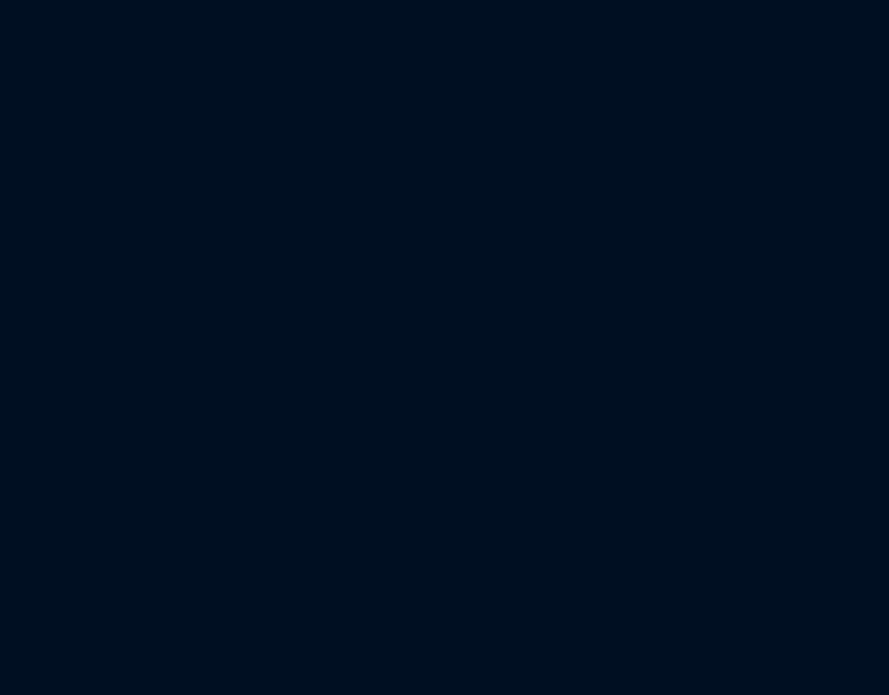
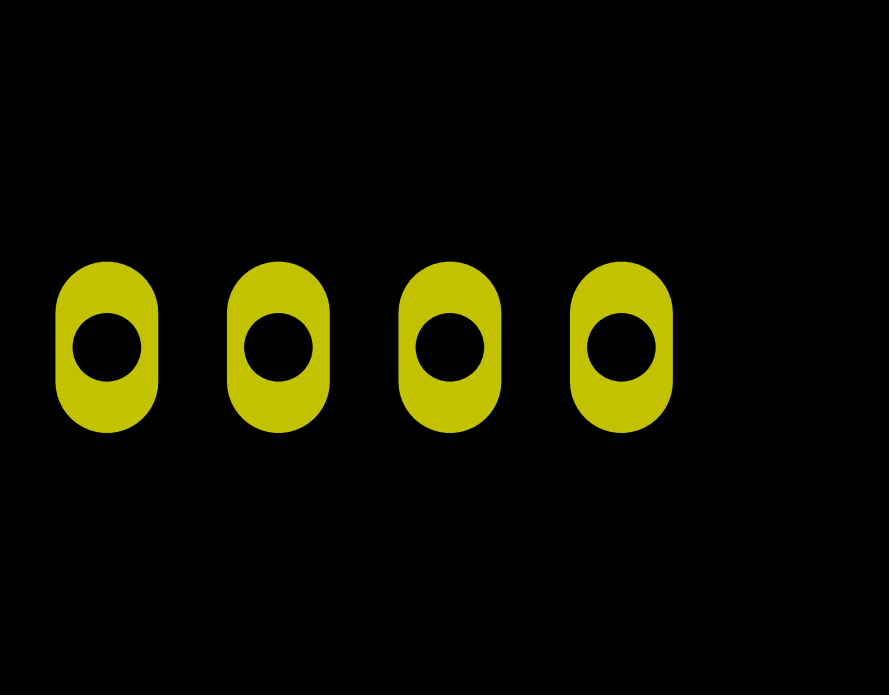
part: none -> (364, 347)

